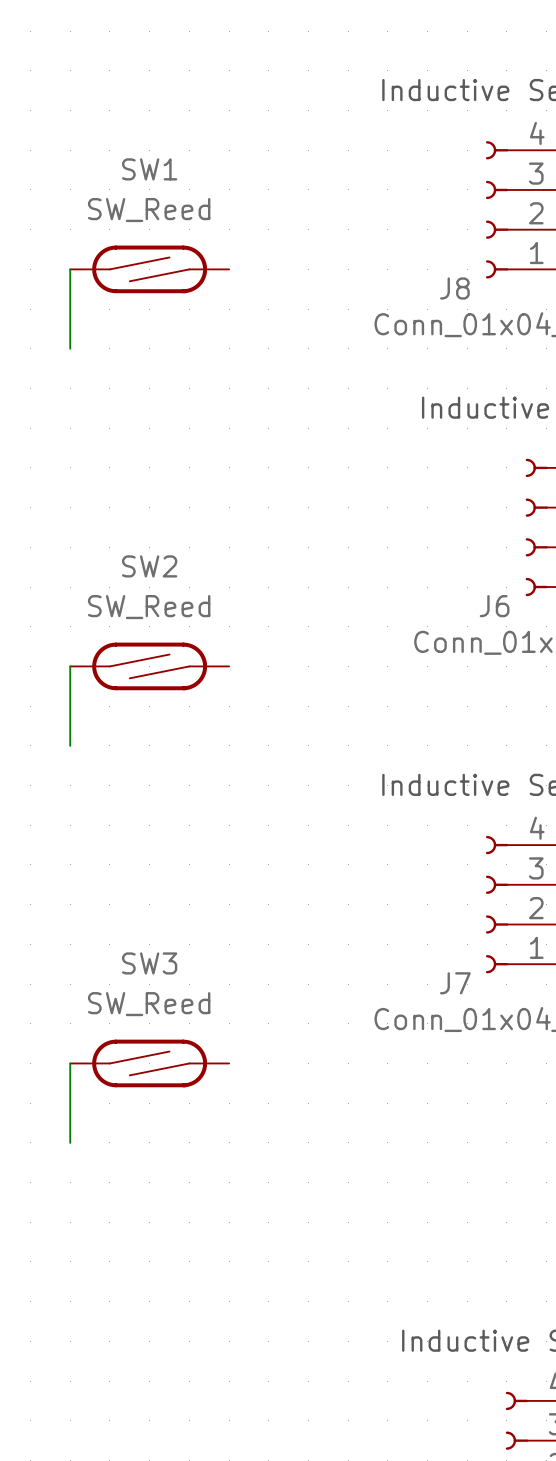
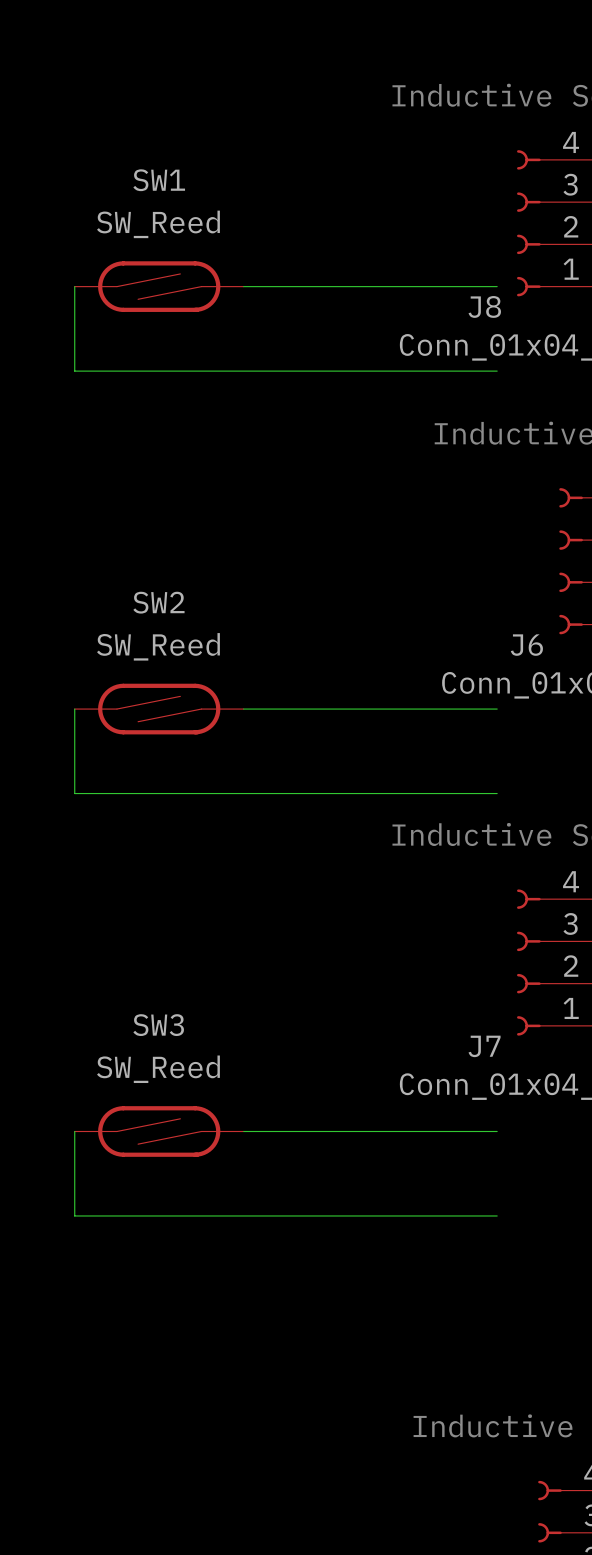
wire: none -> (243, 286) (497, 286)
wire: none -> (74, 371) (497, 371)
wire: none -> (243, 709) (497, 709)
wire: none -> (74, 793) (497, 793)
wire: none -> (243, 1131) (497, 1131)
wire: none -> (74, 1215) (497, 1215)

